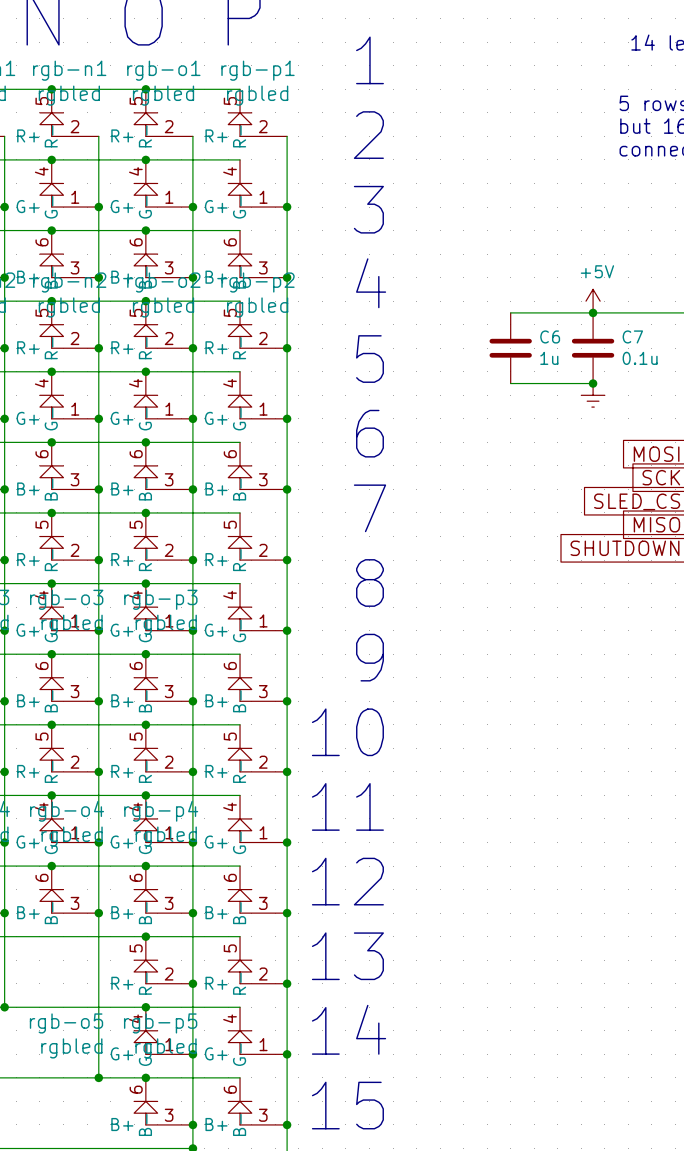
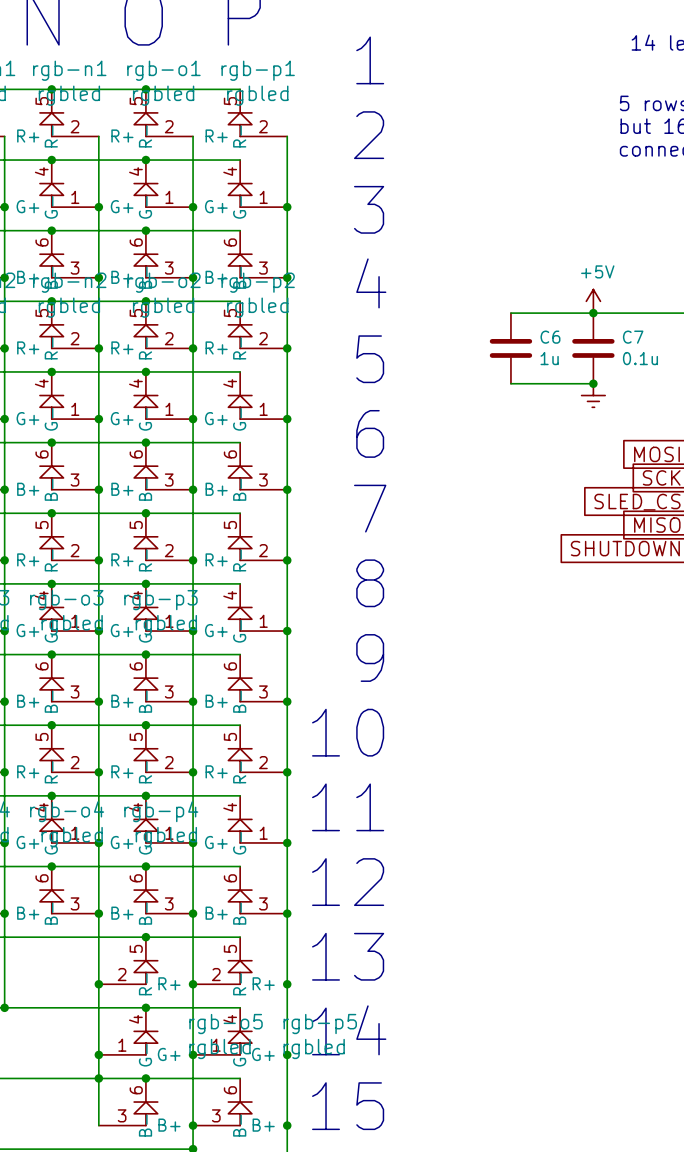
junction: none -> (98, 984)
rgb-o5 flip: as is (145, 1042) -> left-right (145, 1043)
rgb-p5 flip: as is (240, 1042) -> left-right (240, 1043)
junction: none -> (98, 1054)
wire: none -> (98, 1078) (98, 1125)

